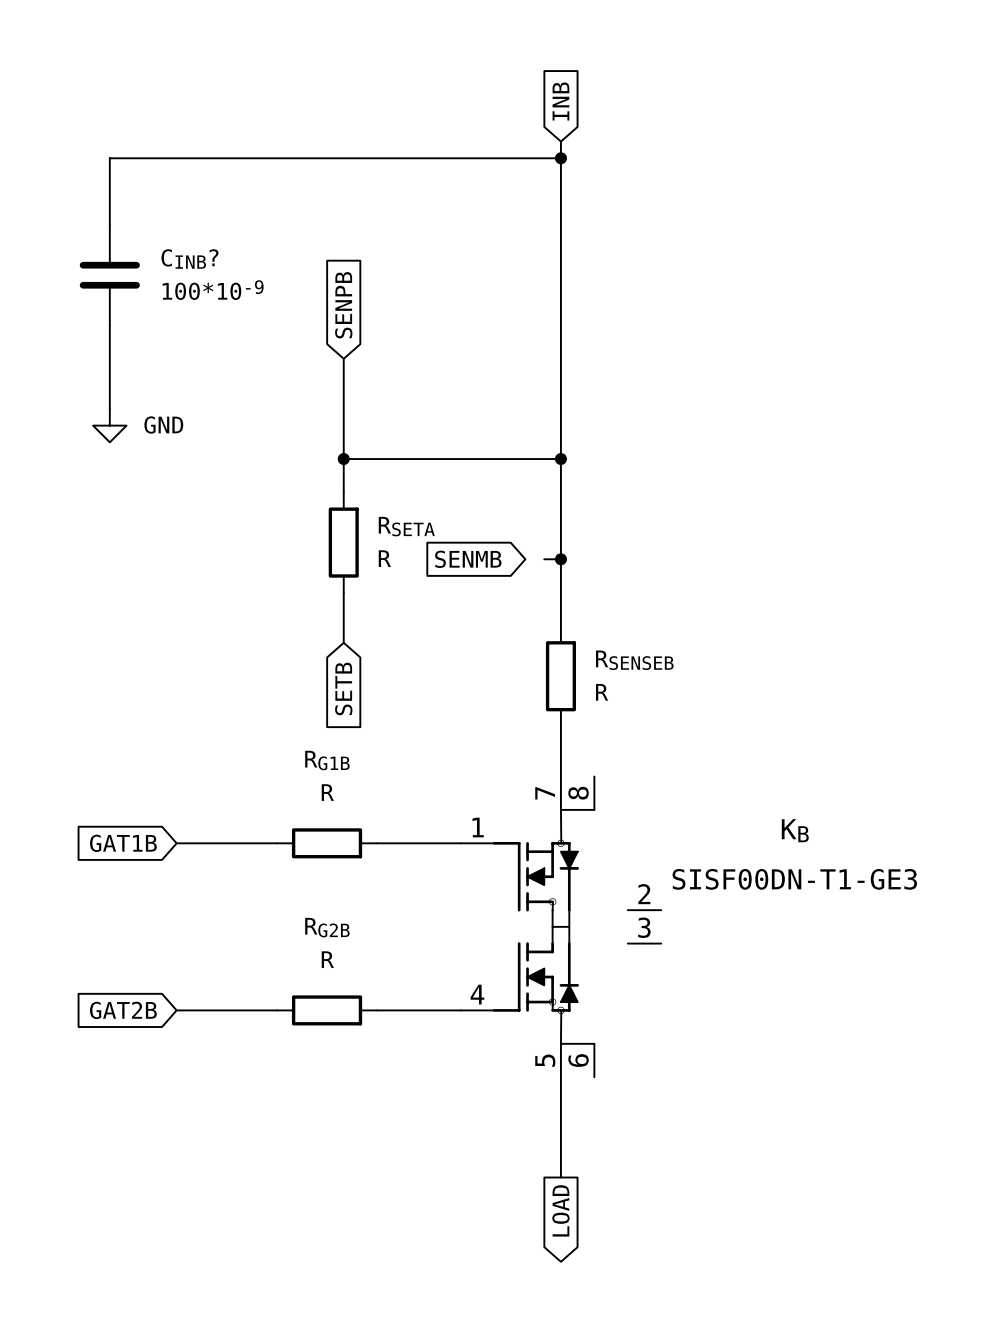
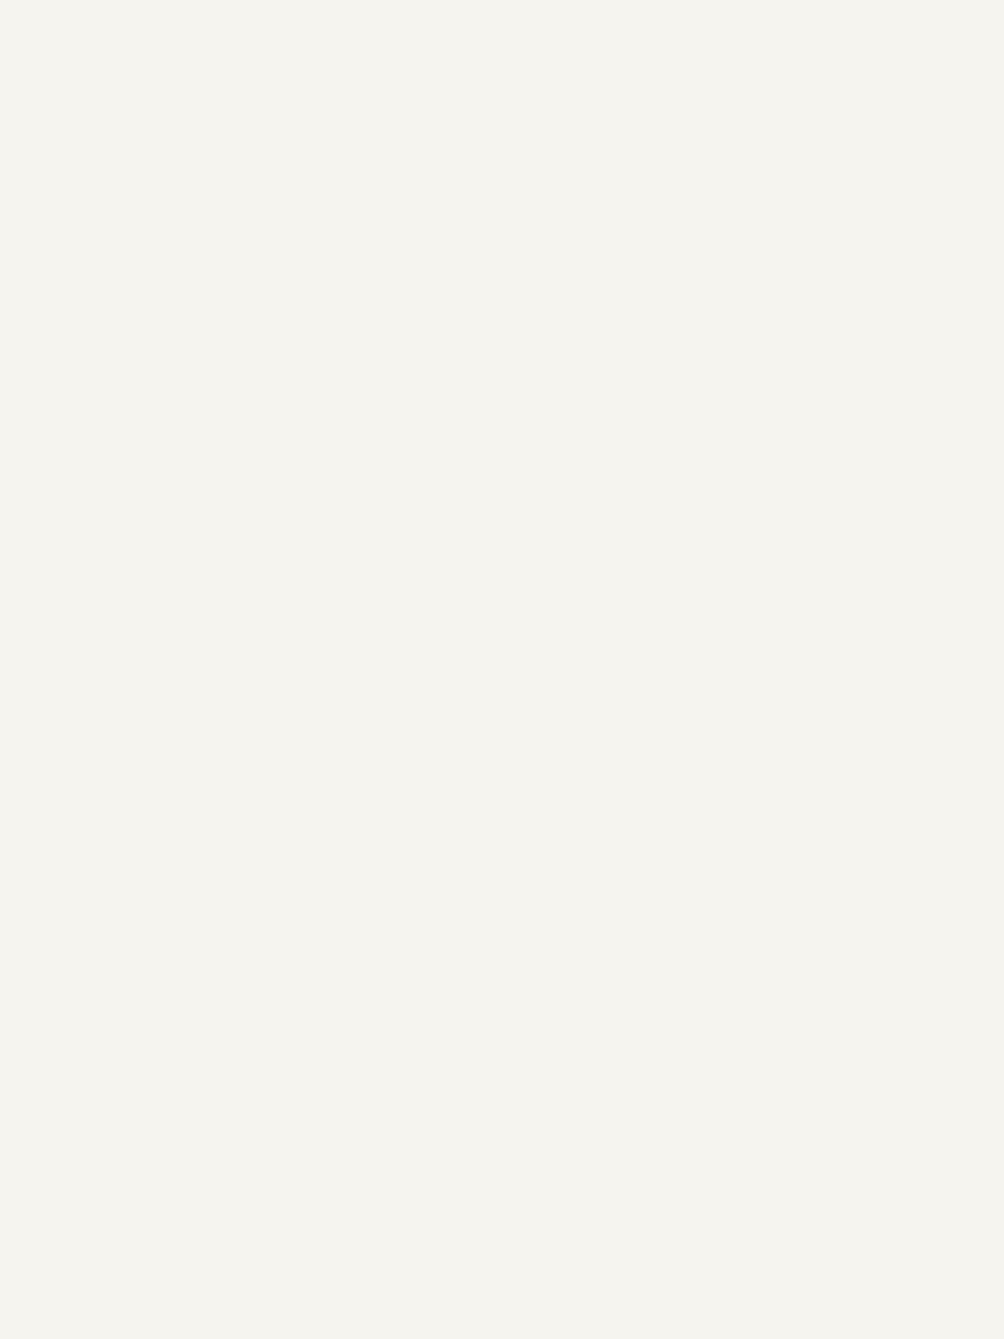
global label: INB (560, 101) -> none
wire: (560, 141) (560, 626) -> none
wire: (560, 158) (109, 158) (109, 225) -> none
junction: (560, 158) -> none
CINB?: 100*10-9 (109, 275) -> none
global label: SENPB (343, 305) -> none
wire: (109, 325) (109, 408) -> none
wire: (343, 358) (343, 492) -> none
power symbol: GND (109, 425) -> none
wire: (343, 459) (560, 459) -> none
junction: (343, 459) -> none
junction: (560, 459) -> none
RSETA: R (343, 542) -> none
global label: SENMB (468, 559) -> none
wire: (544, 559) (560, 559) -> none
junction: (560, 559) -> none
wire: (343, 592) (343, 642) -> none
RSENSEB: R (560, 676) -> none
global label: SETB (343, 688) -> none
wire: (560, 726) (560, 776) -> none
global label: GAT1B (123, 843) -> none
wire: (176, 843) (276, 843) -> none
RG1B: R (327, 843) -> none
wire: (377, 843) (460, 843) -> none
KB: SISF00DN-T1-GE3 (560, 926) -> none
global label: GAT2B (123, 1010) -> none
wire: (176, 1010) (276, 1010) -> none
RG2B: R (327, 1010) -> none
wire: (377, 1010) (460, 1010) -> none
wire: (560, 1077) (560, 1177) -> none
global label: LOAD (560, 1210) -> none

